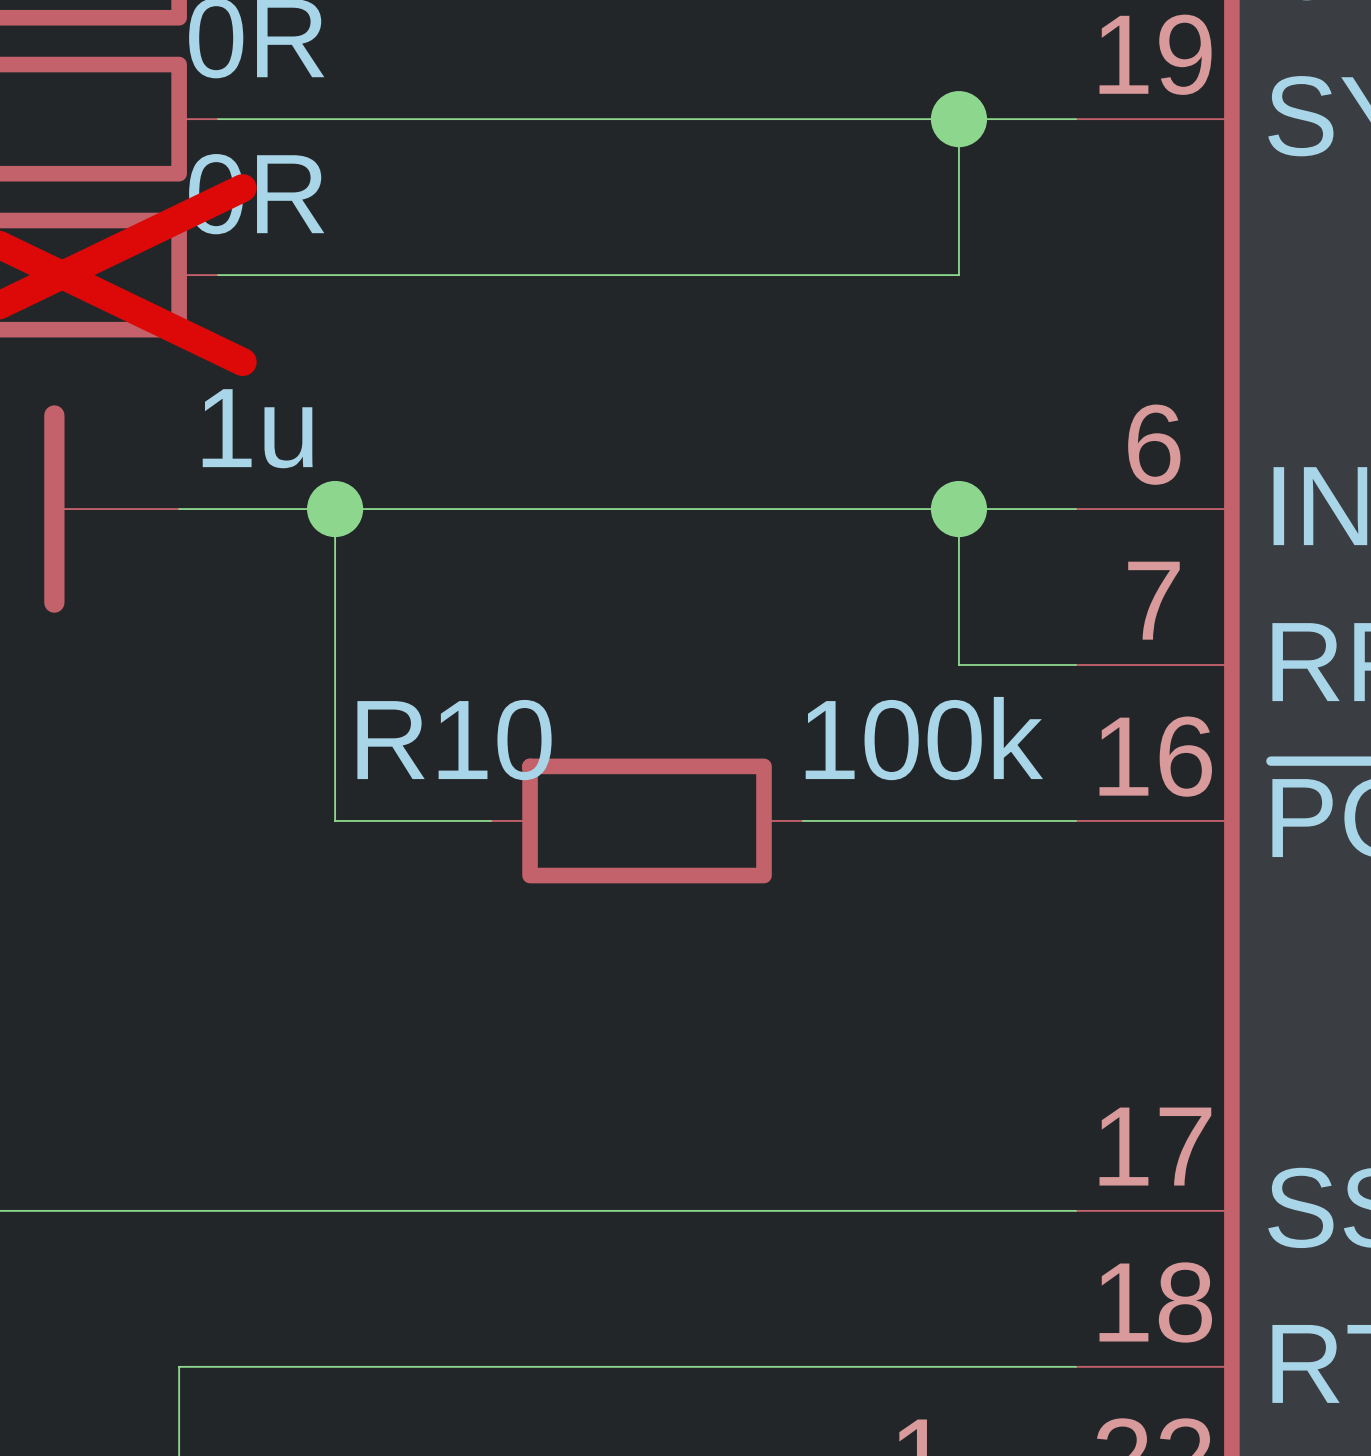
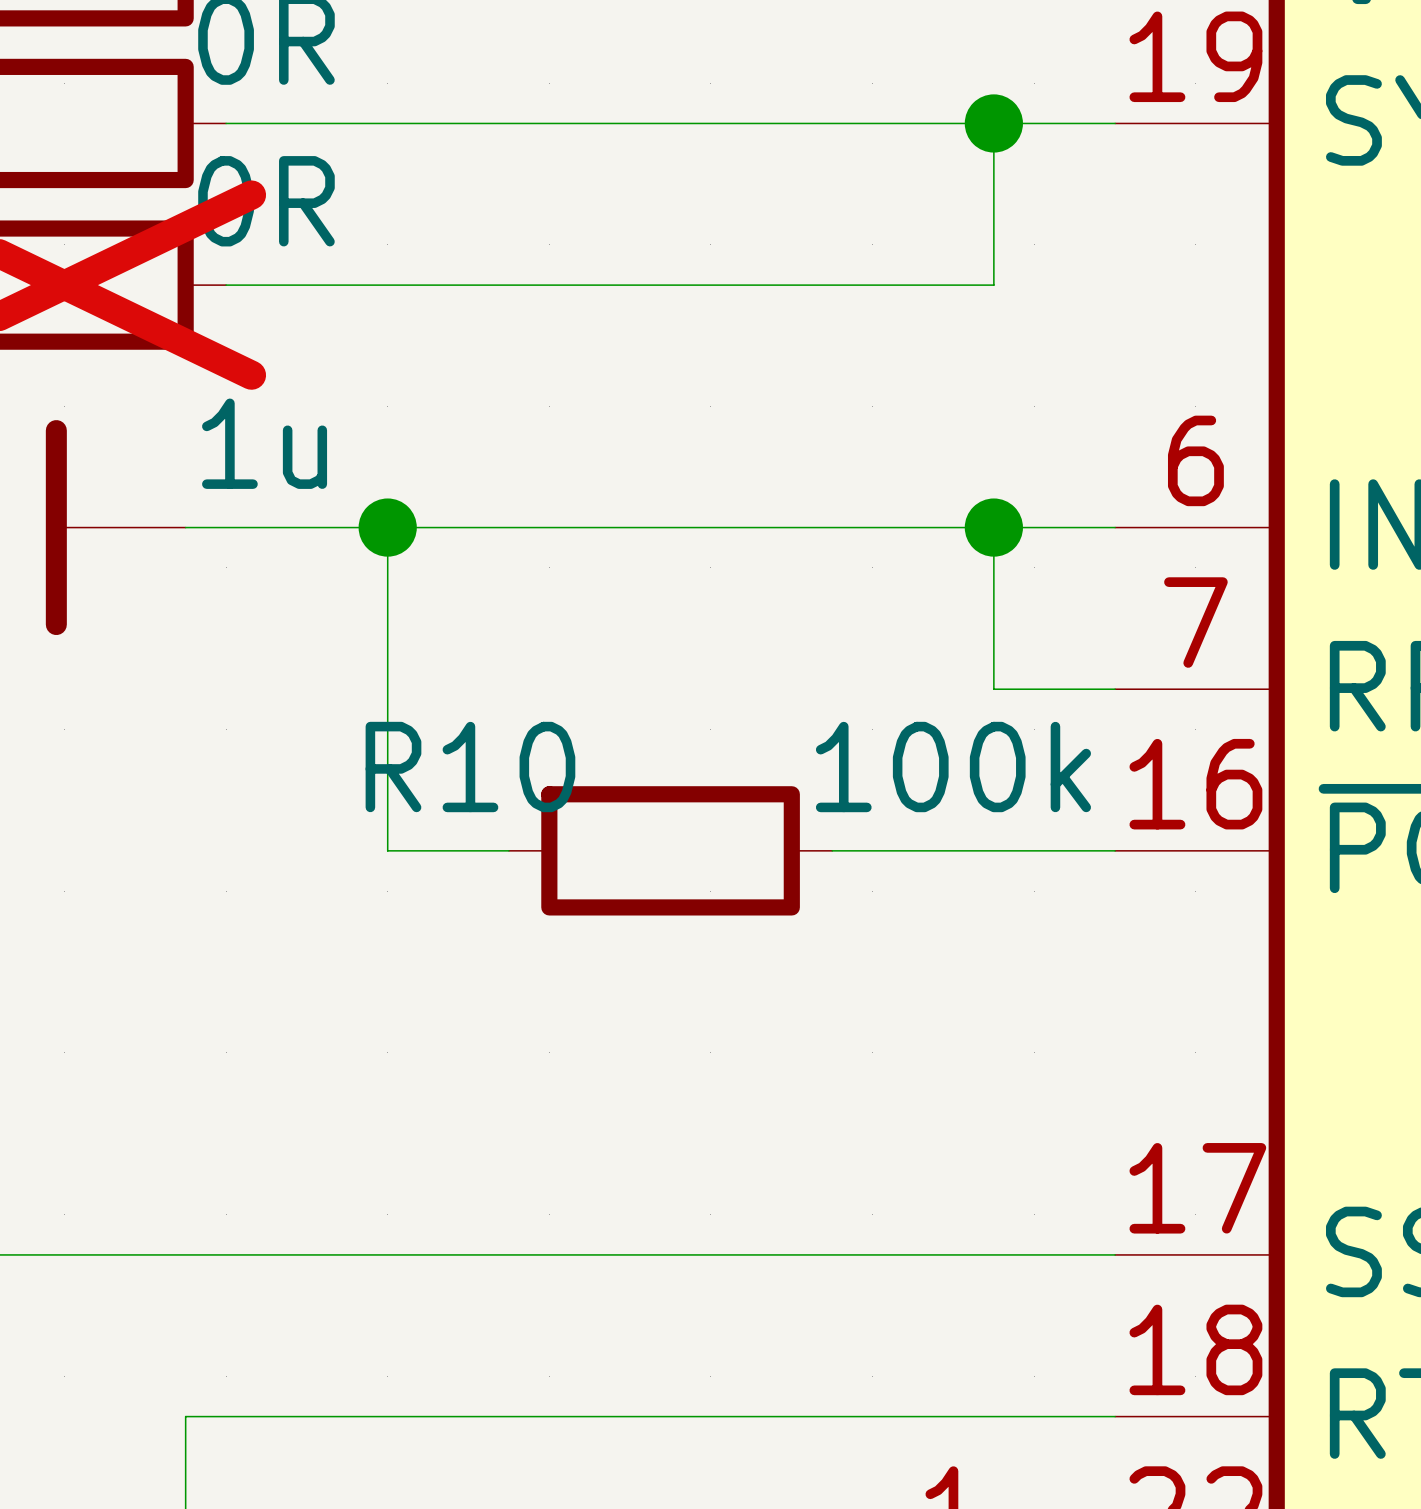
wire: (335, 509) (335, 820) (374, 820) -> (387, 527) (387, 850)
junction position: (335, 509) -> (387, 527)

